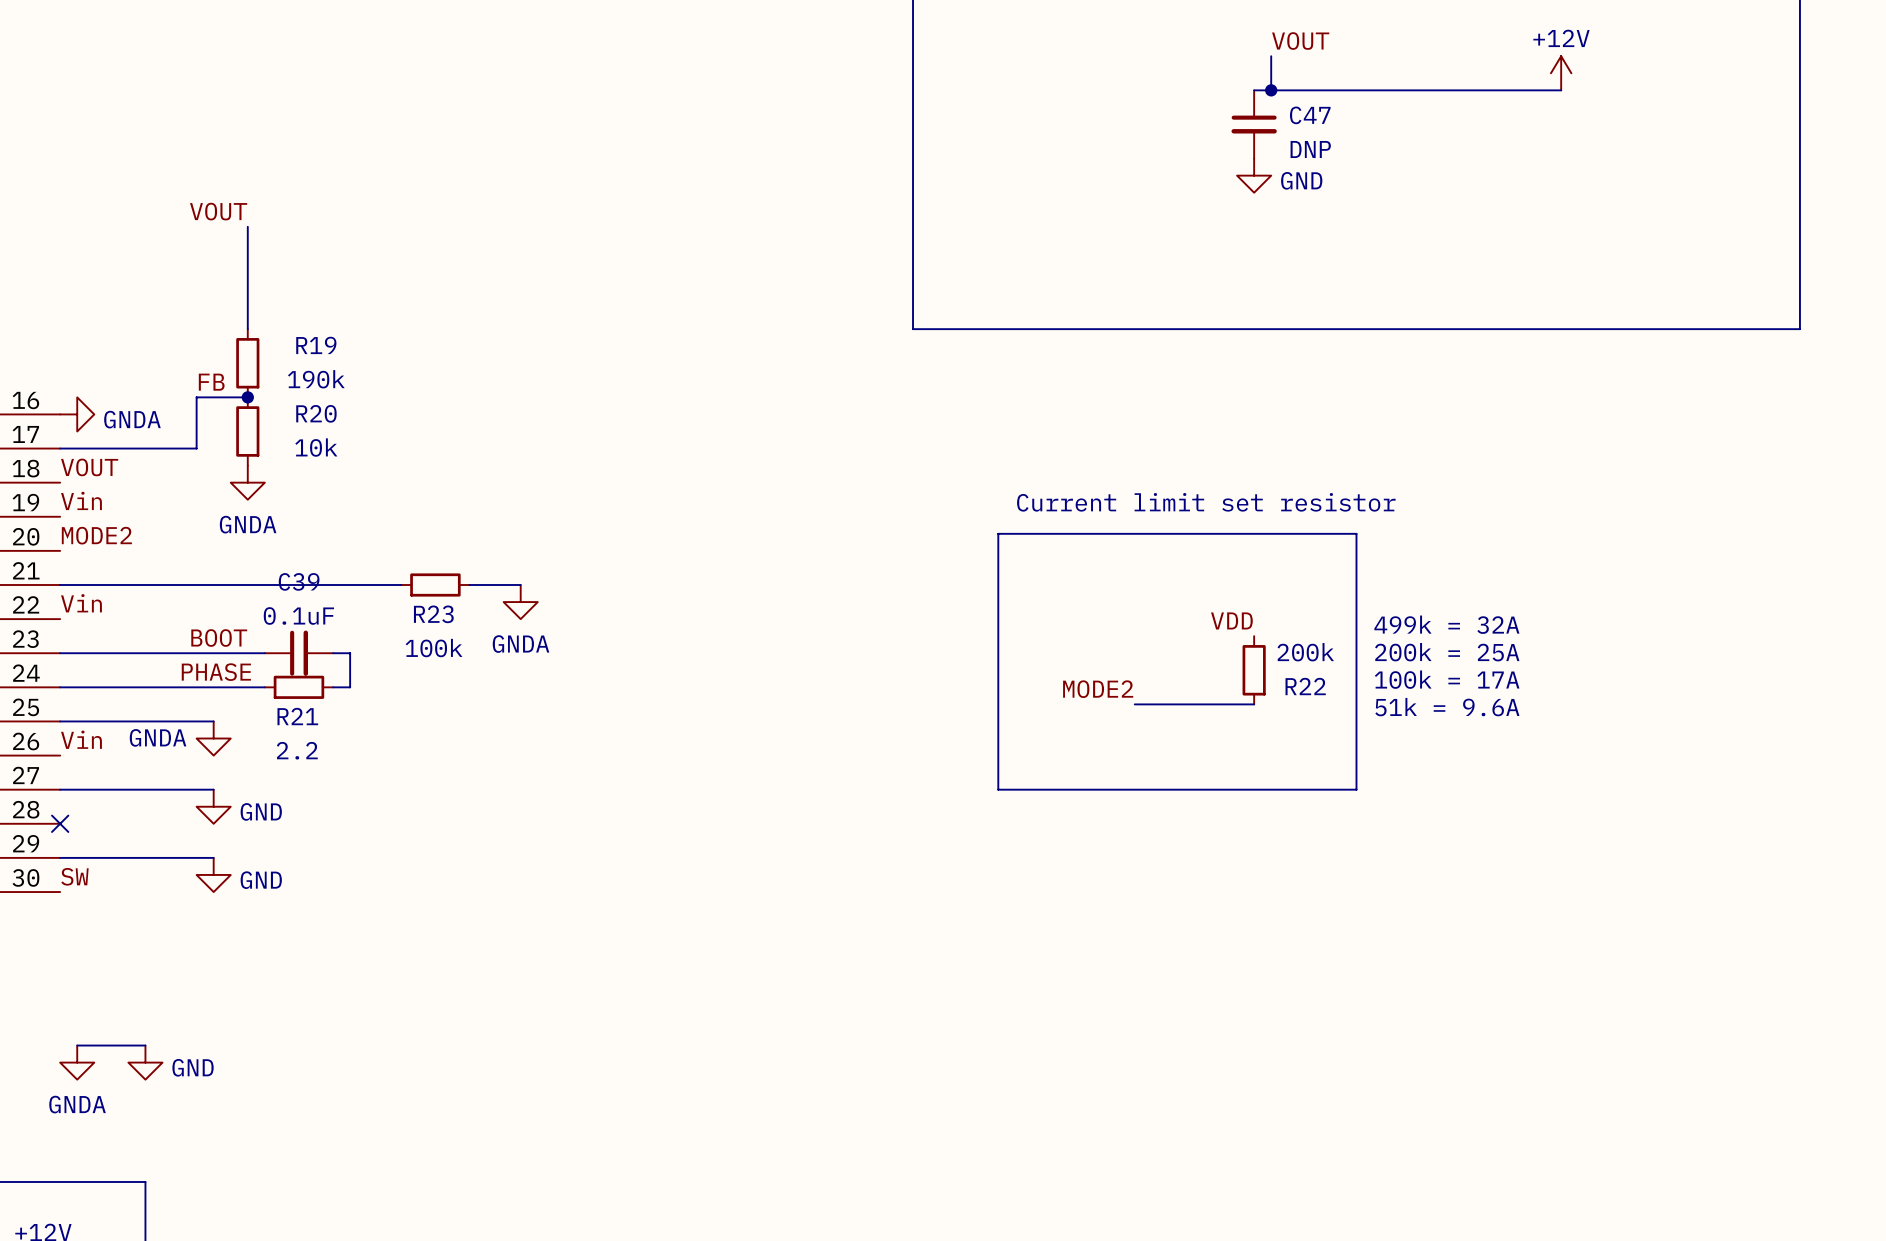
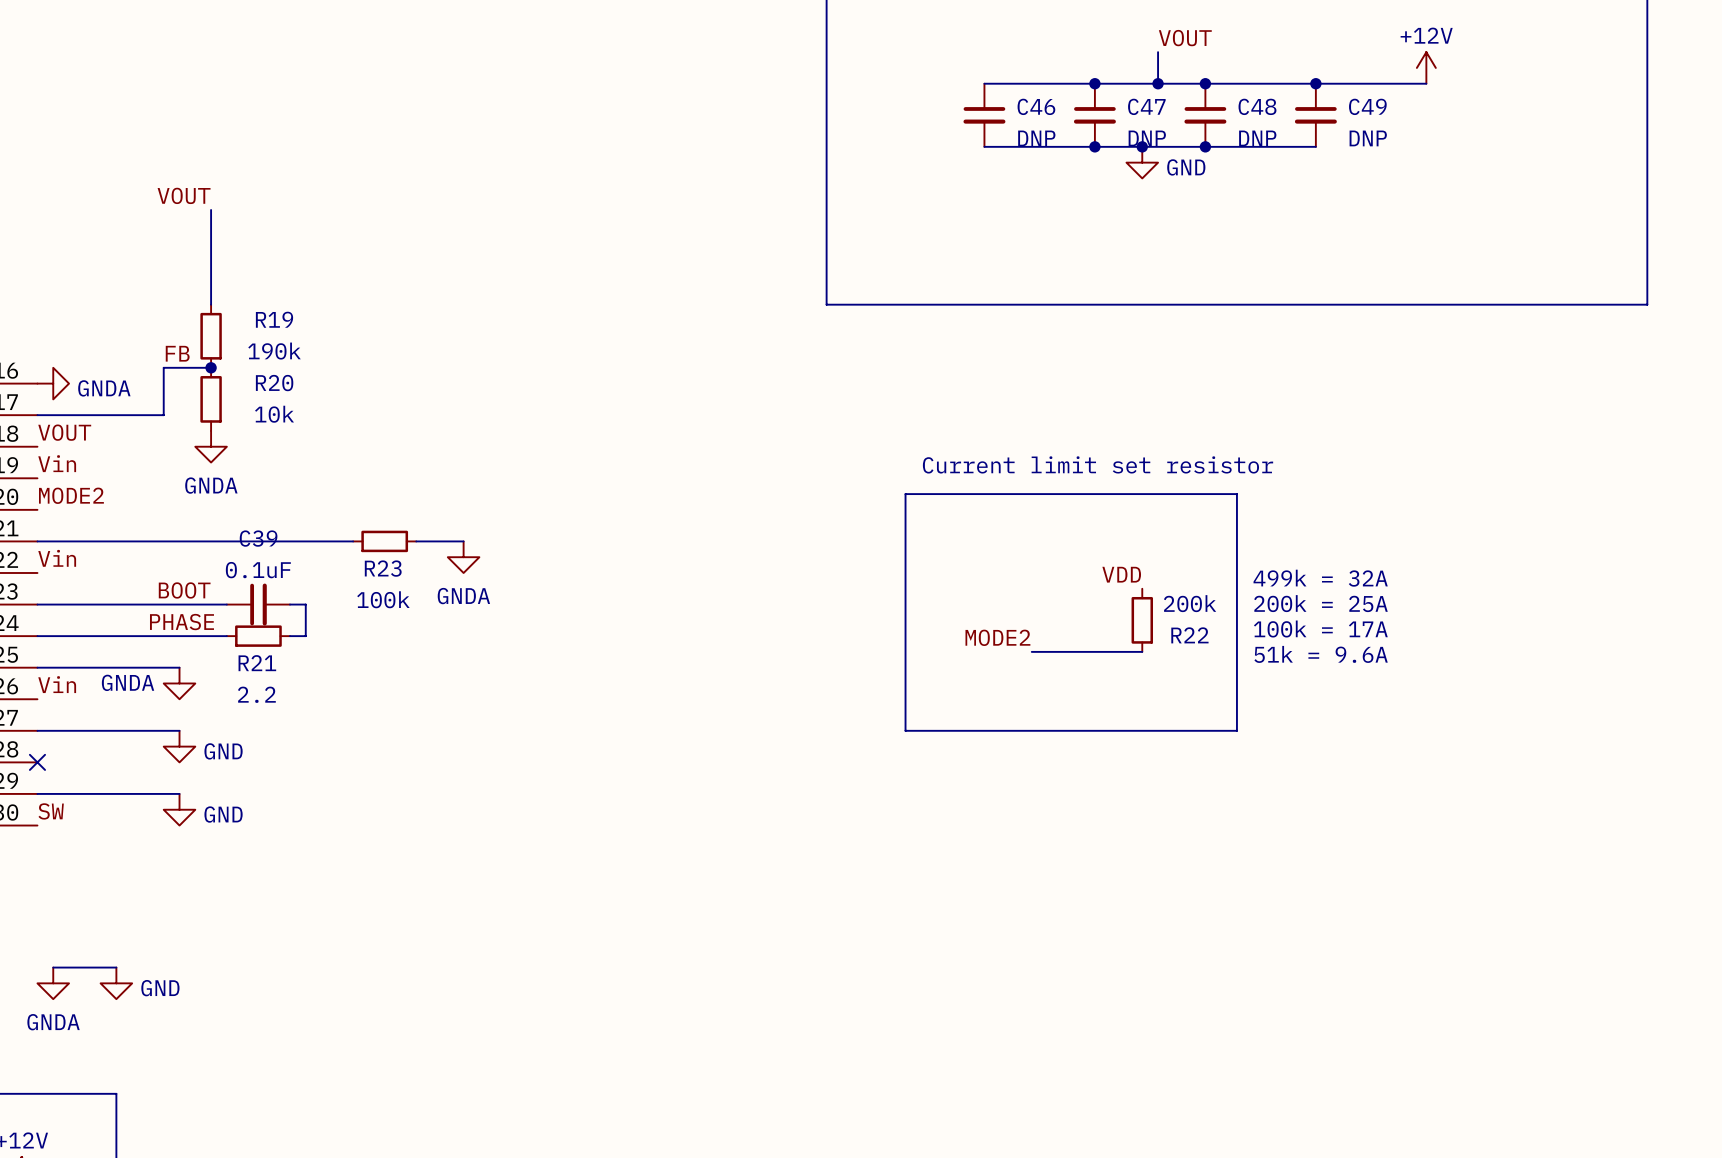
wire: none -> (984, 83) (1142, 83)
junction: none -> (1094, 83)
junction: none -> (1205, 83)
junction: none -> (1315, 83)
C46: none -> DNP (984, 115)
C47 position: (1254, 124) -> (1094, 115)
C48: none -> DNP (1205, 115)
C49: none -> DNP (1315, 115)
wire: none -> (984, 146) (1315, 146)
junction: none -> (1094, 146)
junction: none -> (1142, 146)
junction: none -> (1205, 146)

